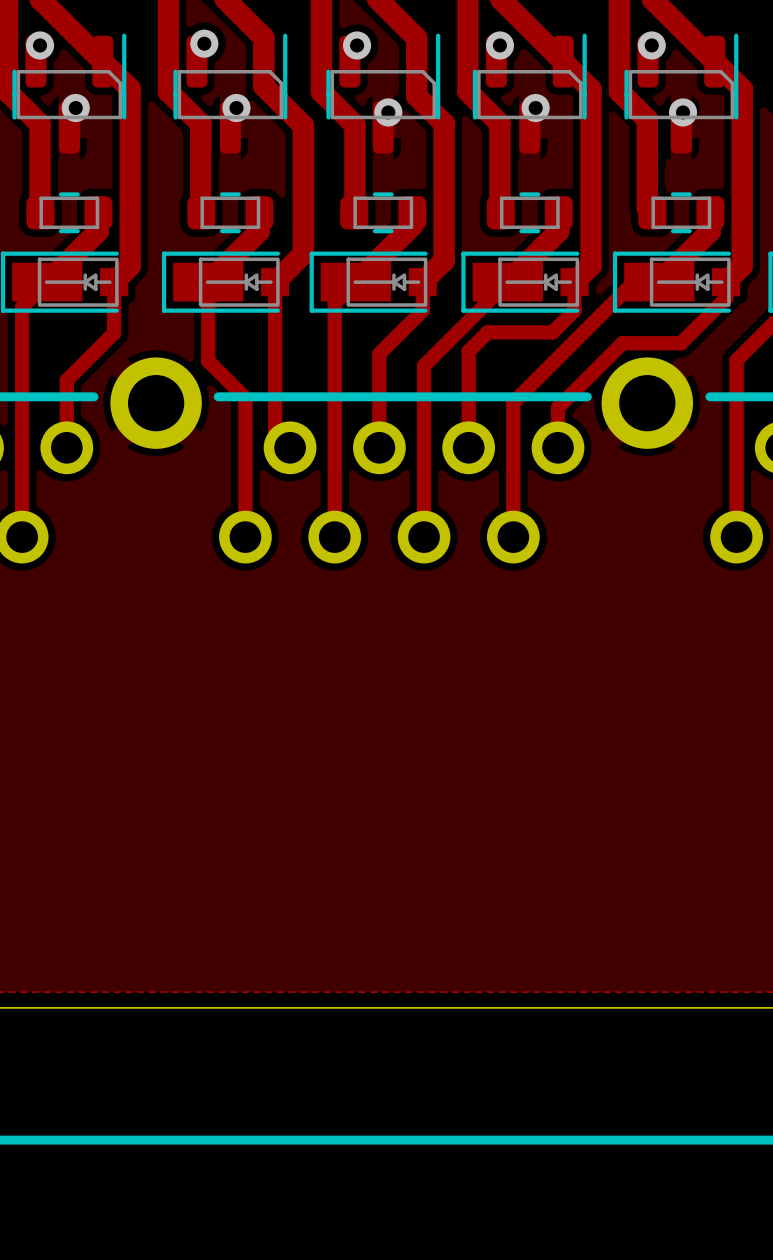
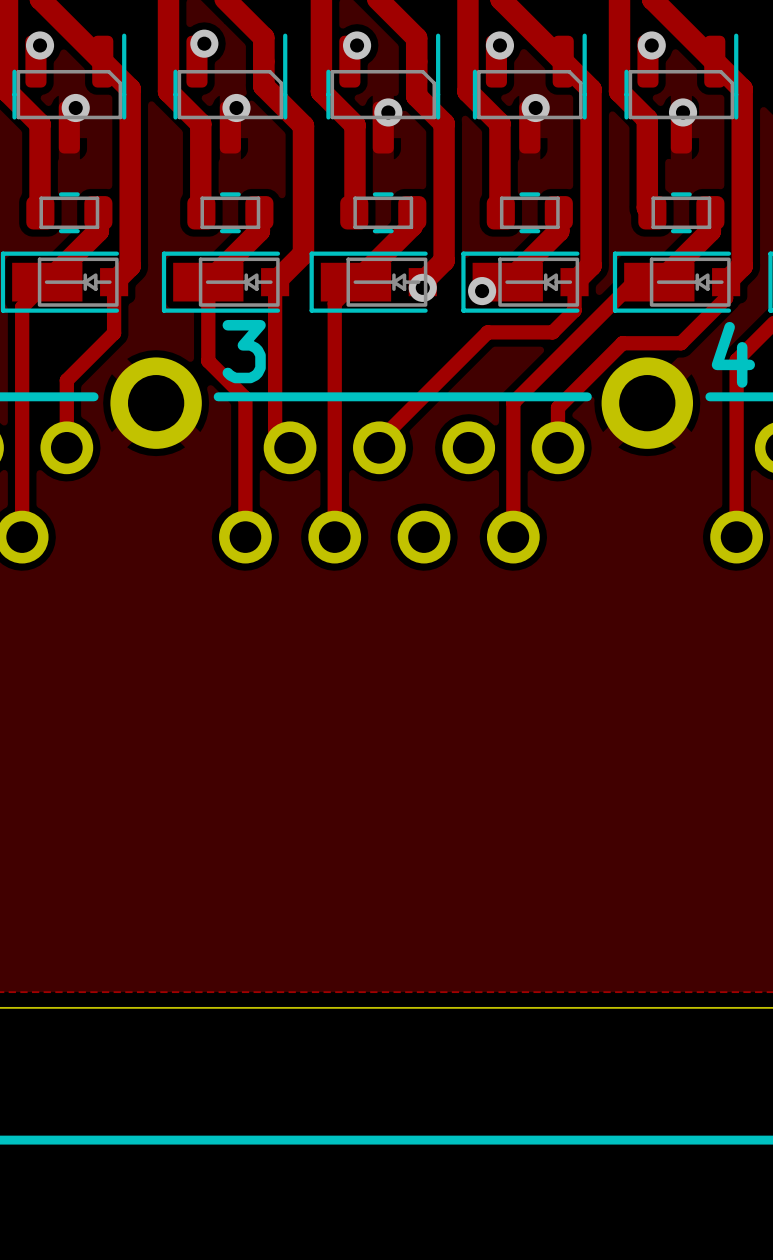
track: (507, 282) (424, 365) (424, 537) -> none
track: (422, 287) (422, 310) (379, 353) (379, 440) -> (468, 351) (379, 440)
via: none -> (422, 287)
via: none -> (482, 291)
text: none -> 3 (244, 351)
track: (468, 351) (468, 447) -> none
text: none -> 4 (733, 354)

